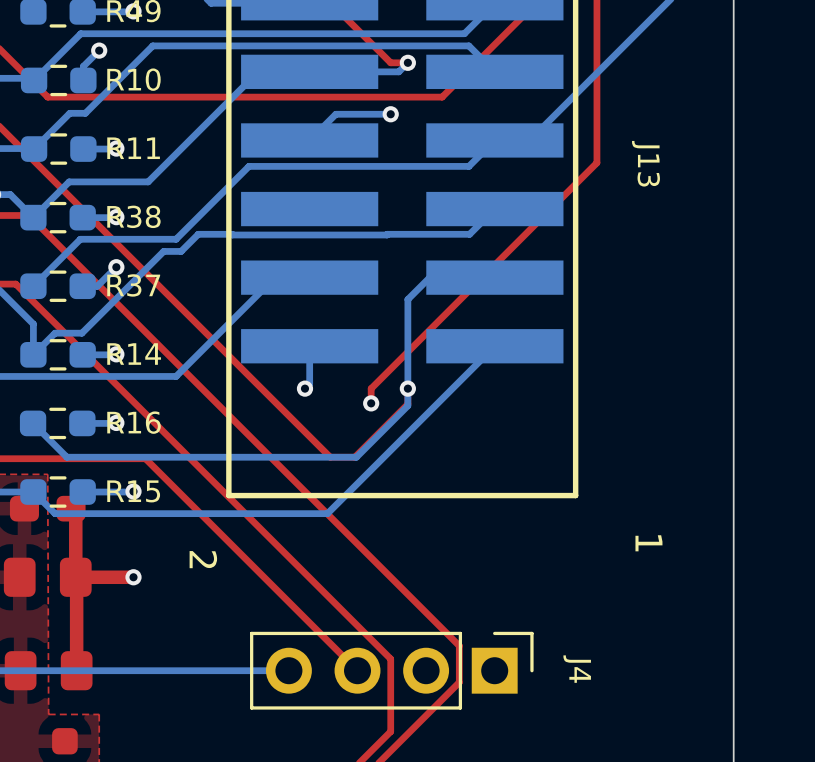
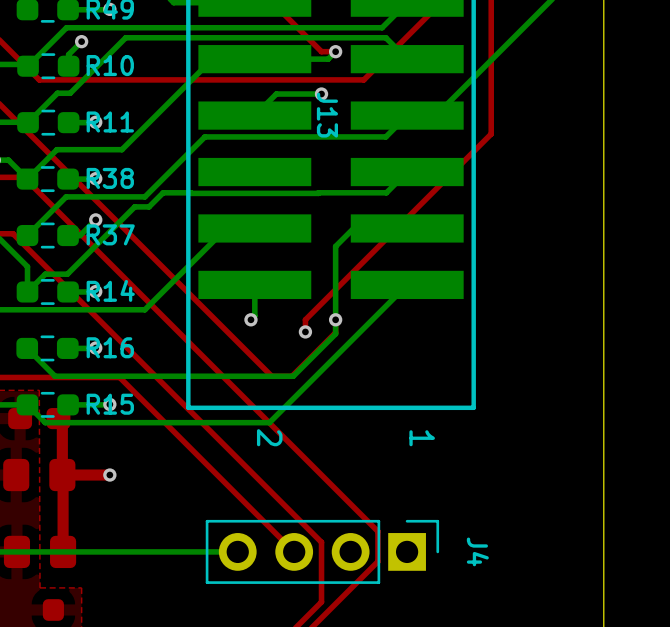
J13 name position: J13 (645, 163) -> J13 (327, 115)
J13 text position: 1 (648, 543) -> 1 (422, 438)
J13 text position: 2 (203, 559) -> 2 (269, 437)

